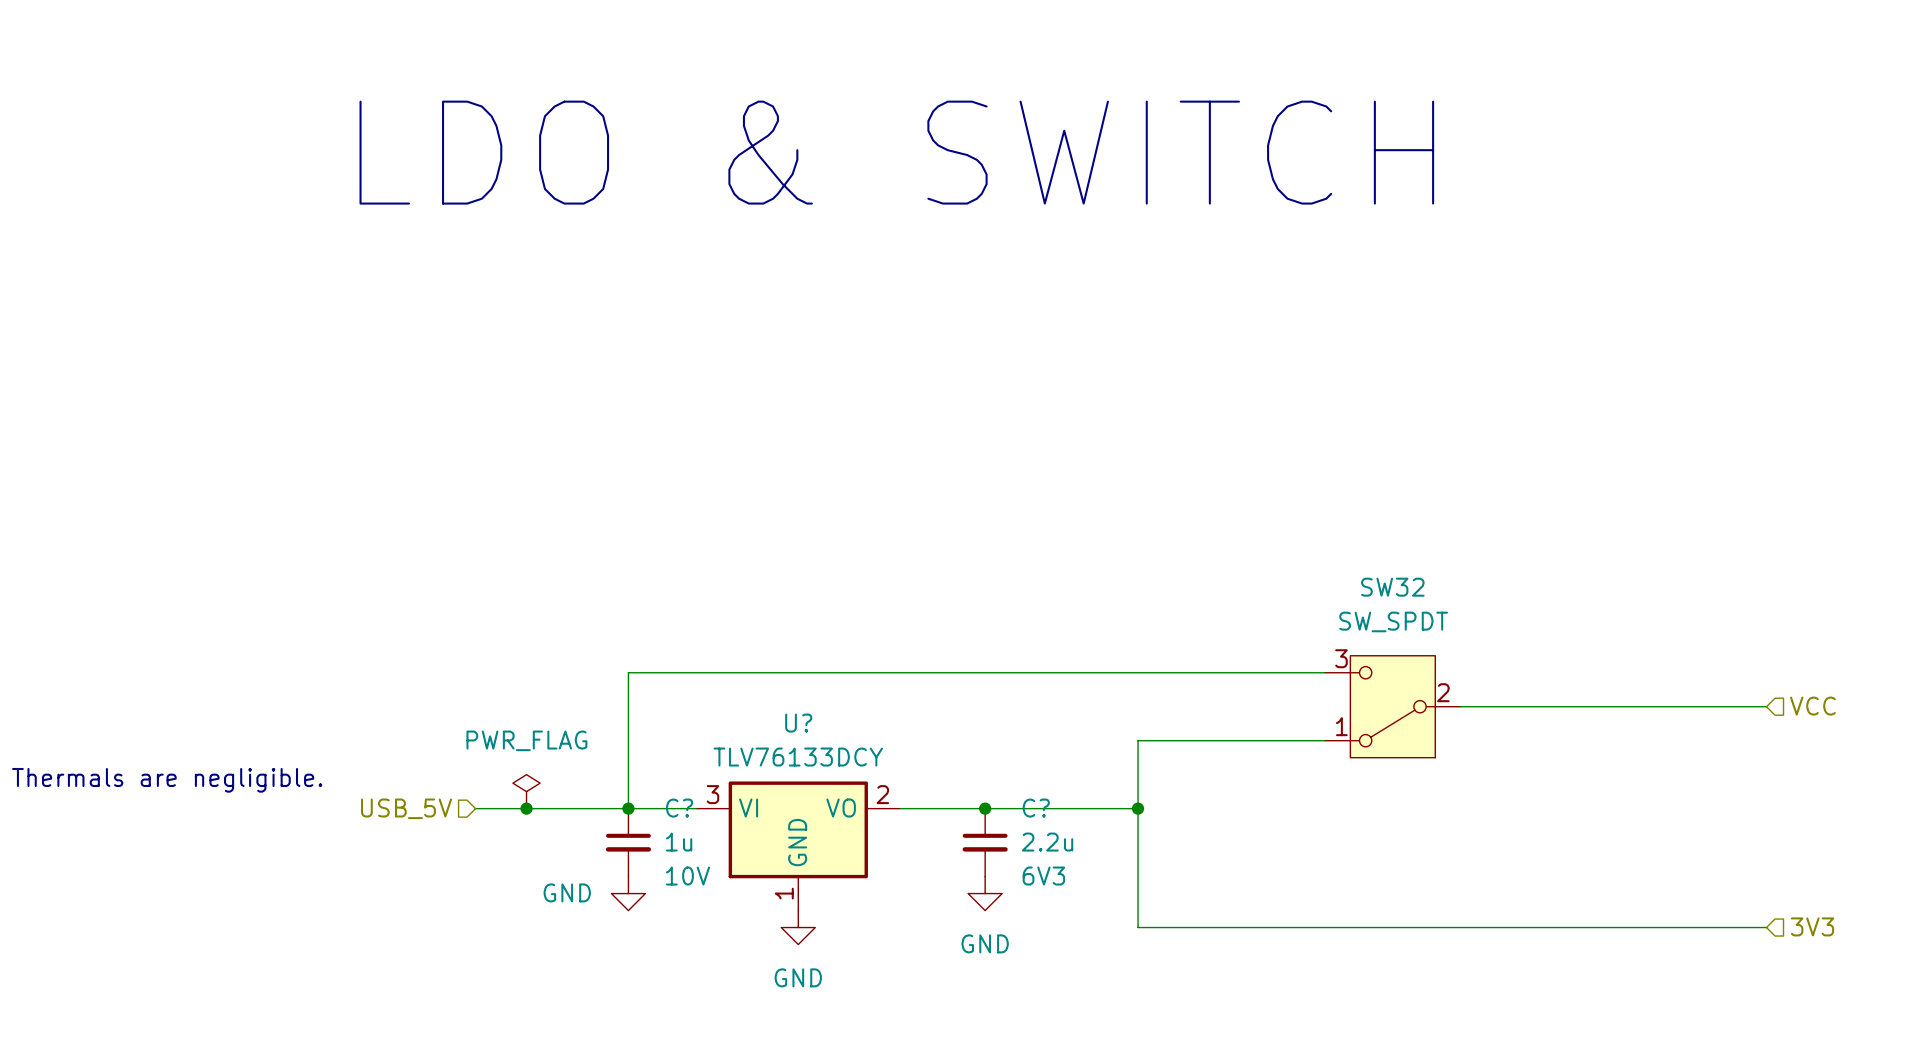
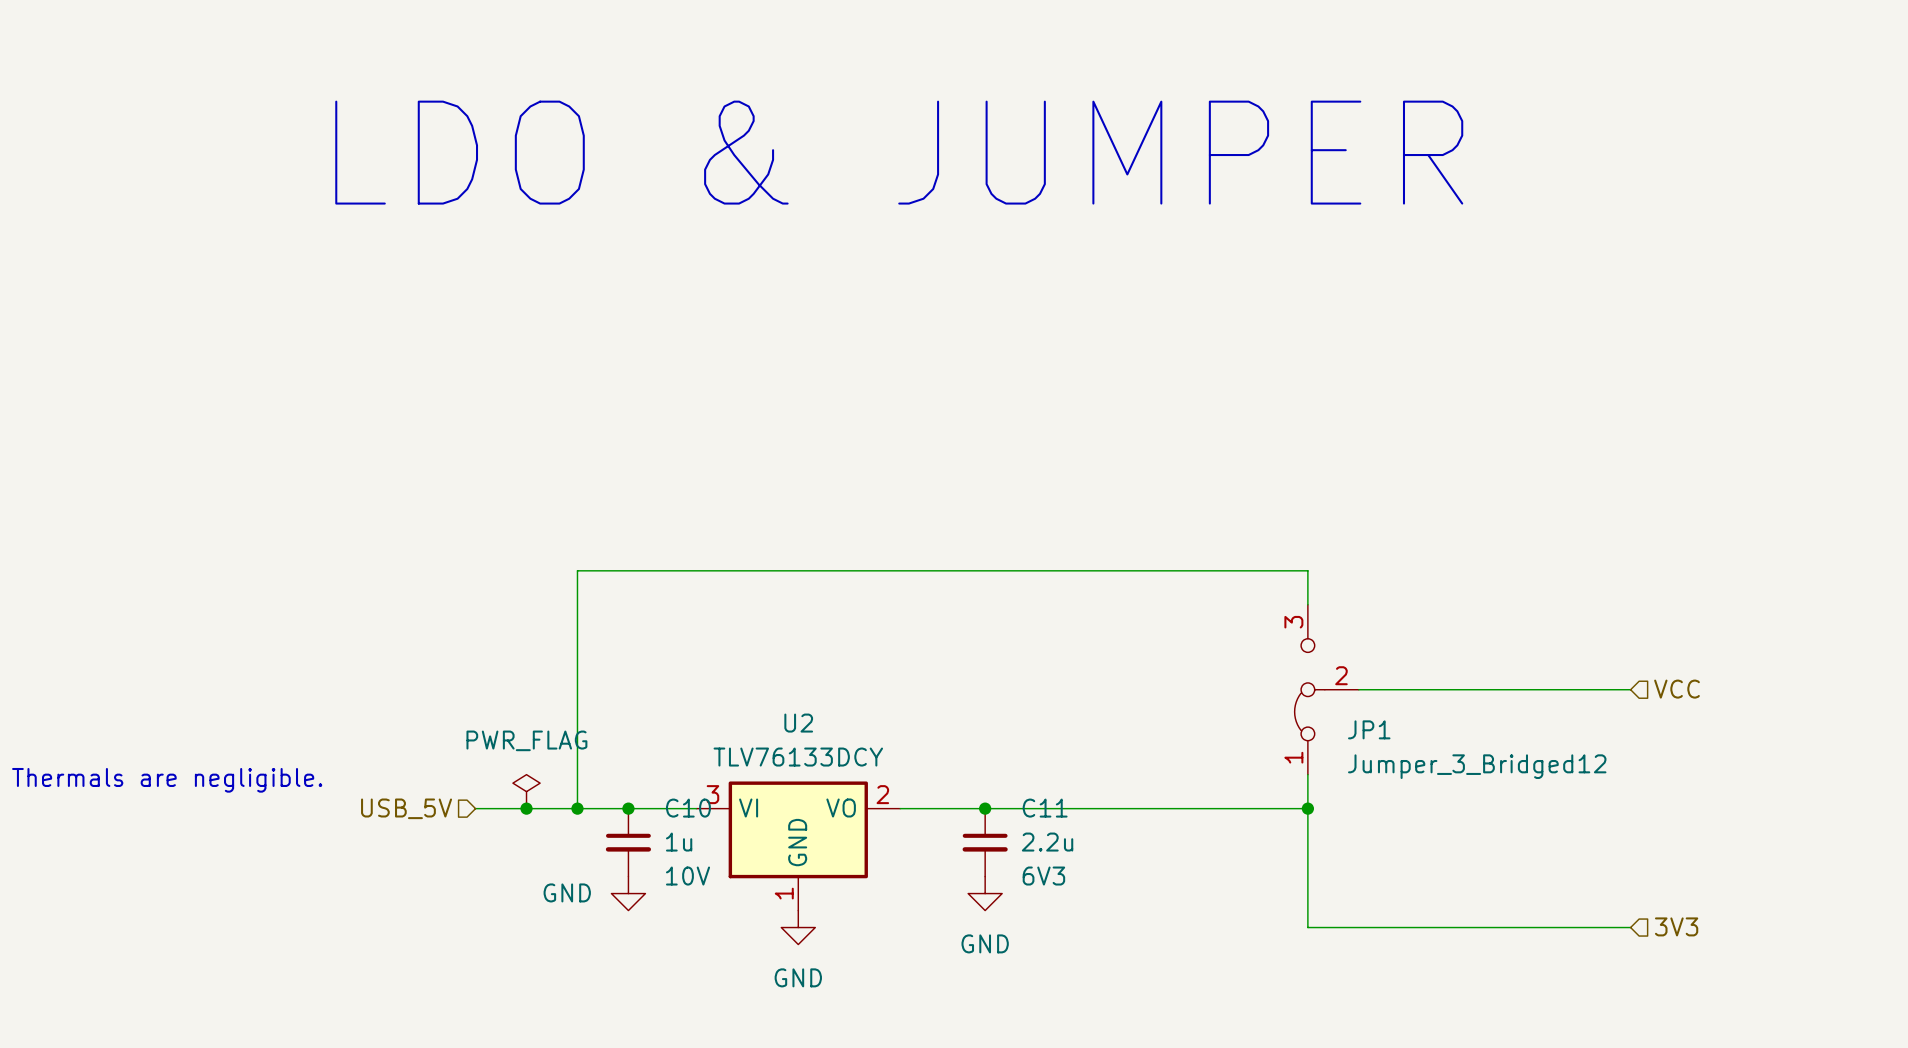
text: LDO & SWITCH (896, 152) -> LDO & JUMPER (899, 152)
wire: none -> (1307, 604) (1307, 570) (577, 570) (577, 808)
wire: (1324, 672) (628, 672) (628, 808) -> none
JP1: none -> Jumper_3_Bridged12 (1326, 689)
wire: none -> (1358, 689) (1630, 689)
SW32: SW_SPDT (1392, 706) -> none
wire: (1460, 706) (1766, 706) -> none
hierarchical label position: VCC (1812, 706) -> VCC (1677, 689)
U? name: U? (798, 723) -> U2 (798, 723)
wire: (1324, 740) (1138, 740) (1138, 927) (1307, 927) -> (1307, 774) (1307, 927)
junction: none -> (577, 808)
C? name: C? (679, 808) -> C10 (688, 808)
C? name: C? (1036, 808) -> C11 (1045, 808)
wire: none -> (1138, 808) (1307, 808)
junction: (1138, 808) -> none
junction: none -> (1307, 808)
hierarchical label position: 3V3 (1812, 926) -> 3V3 (1676, 926)
wire: (1630, 927) (1766, 927) -> none

